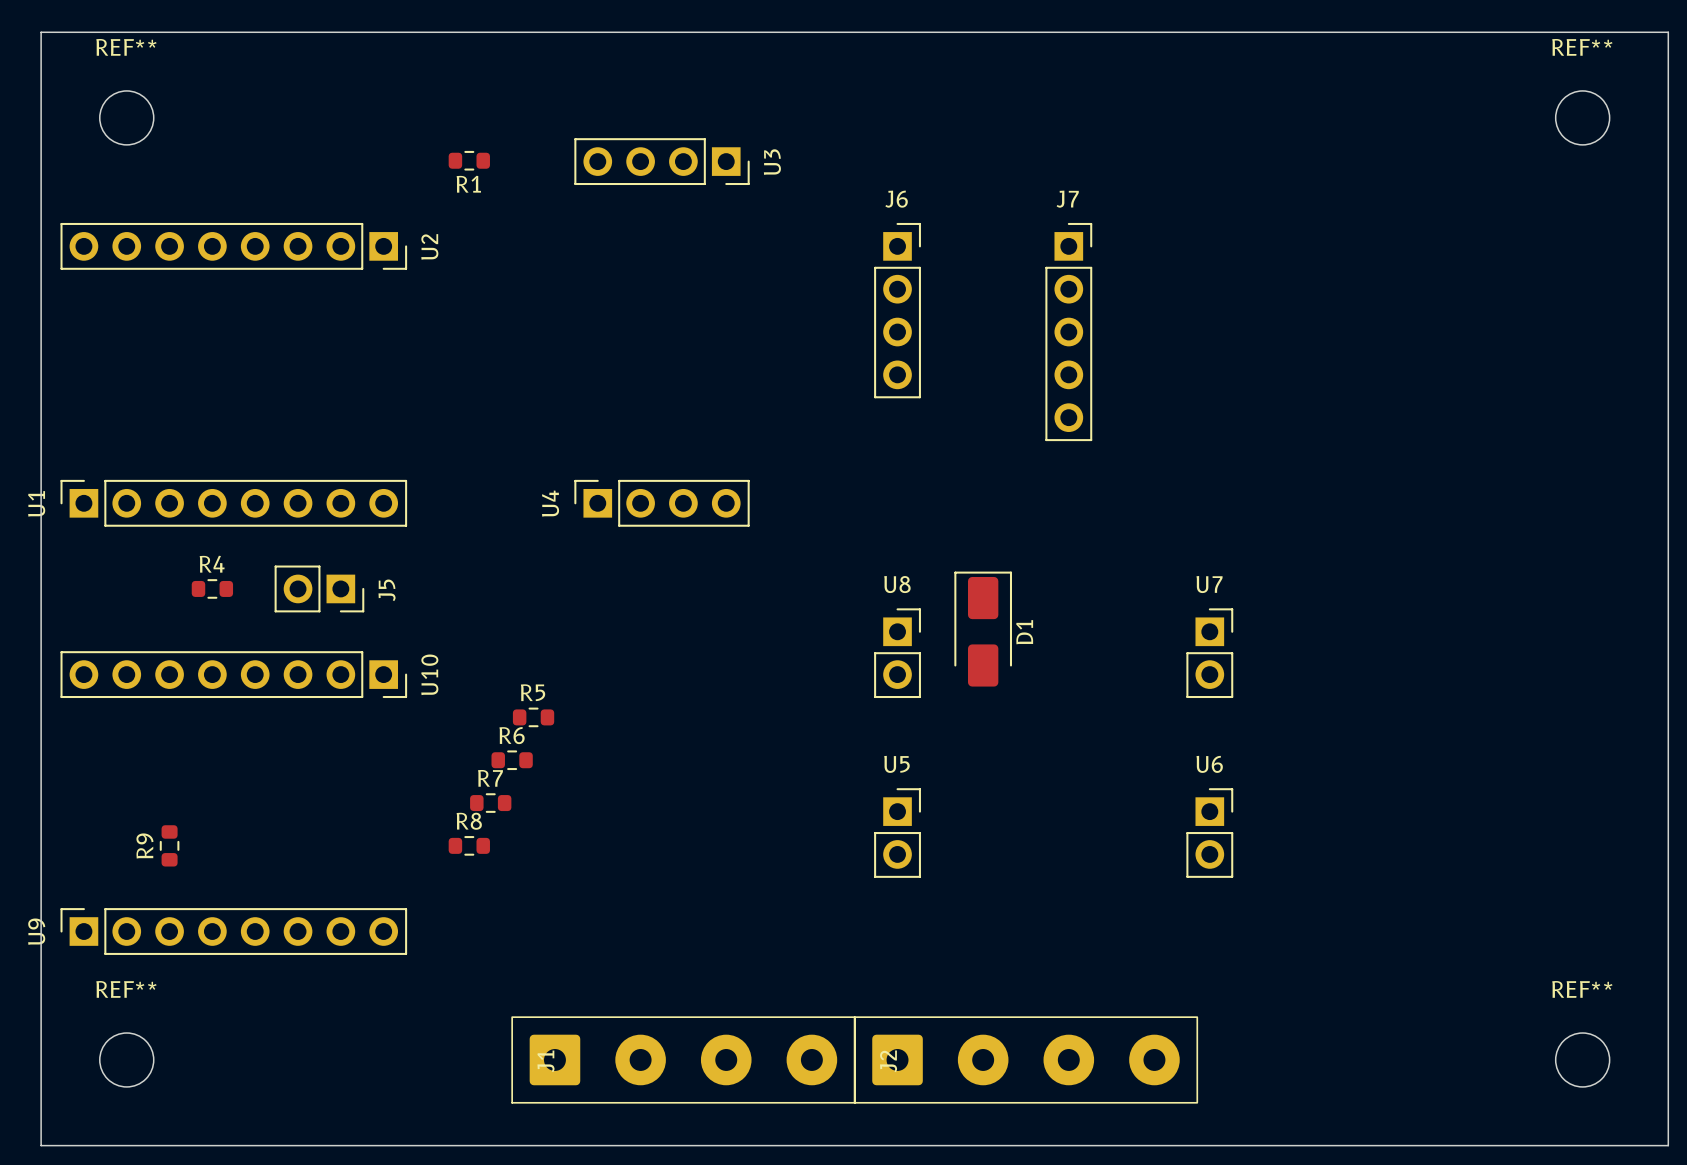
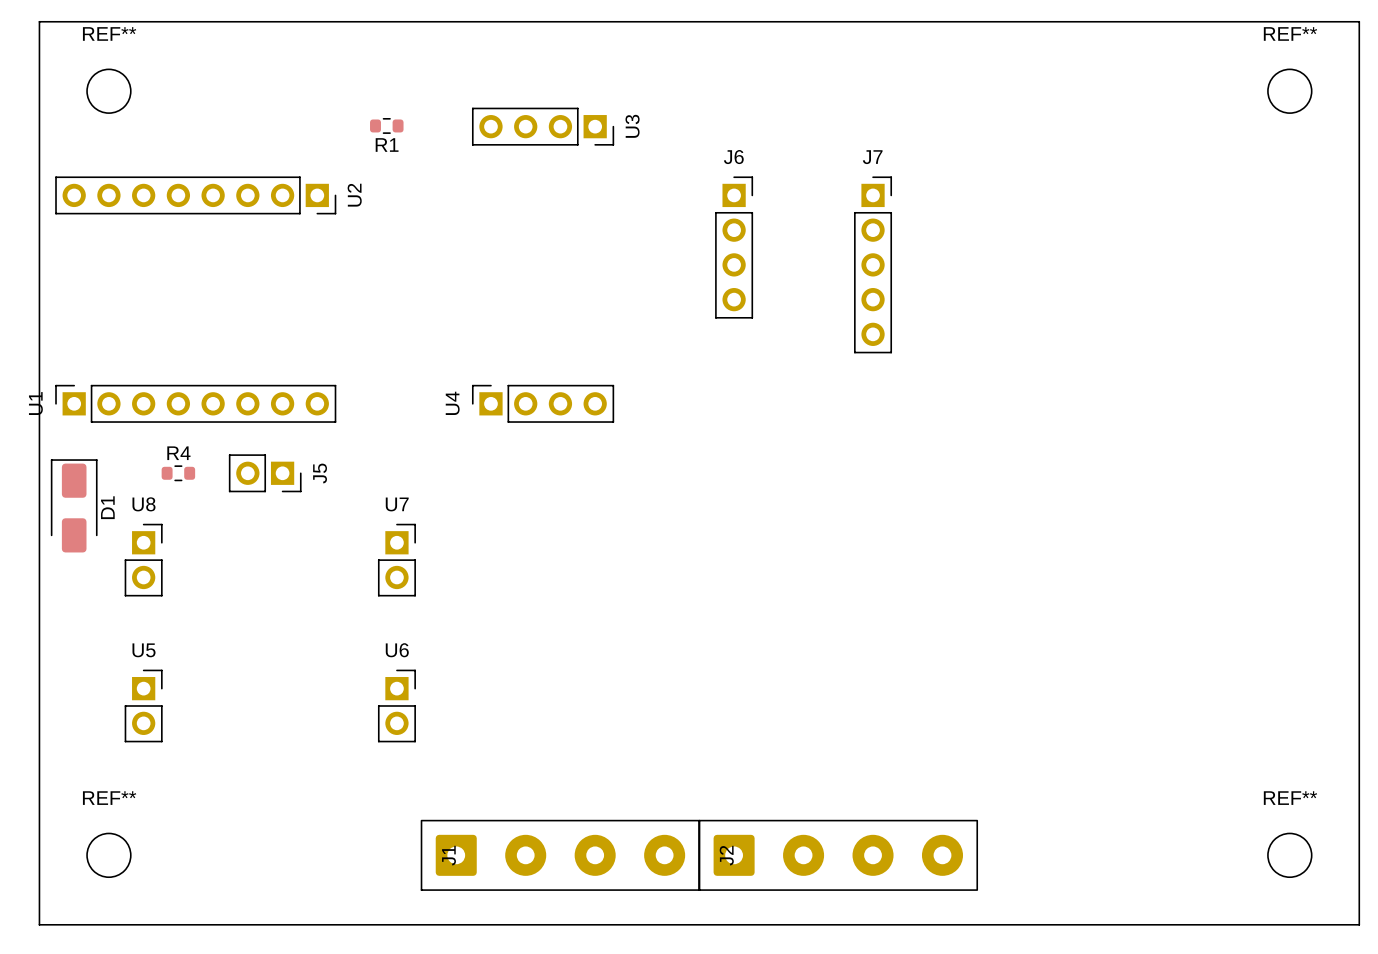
D1 position: (983, 629) -> (74, 505)
U8 position: (897, 653) -> (143, 560)
U7 position: (1209, 653) -> (396, 560)
U10: (233, 674) -> none
R5: (533, 717) -> none
R6: (512, 760) -> none
R7: (490, 803) -> none
U5 position: (897, 833) -> (143, 705)
U6 position: (1209, 833) -> (396, 705)
R9: (169, 845) -> none
R8: (469, 845) -> none
U9: (233, 931) -> none

